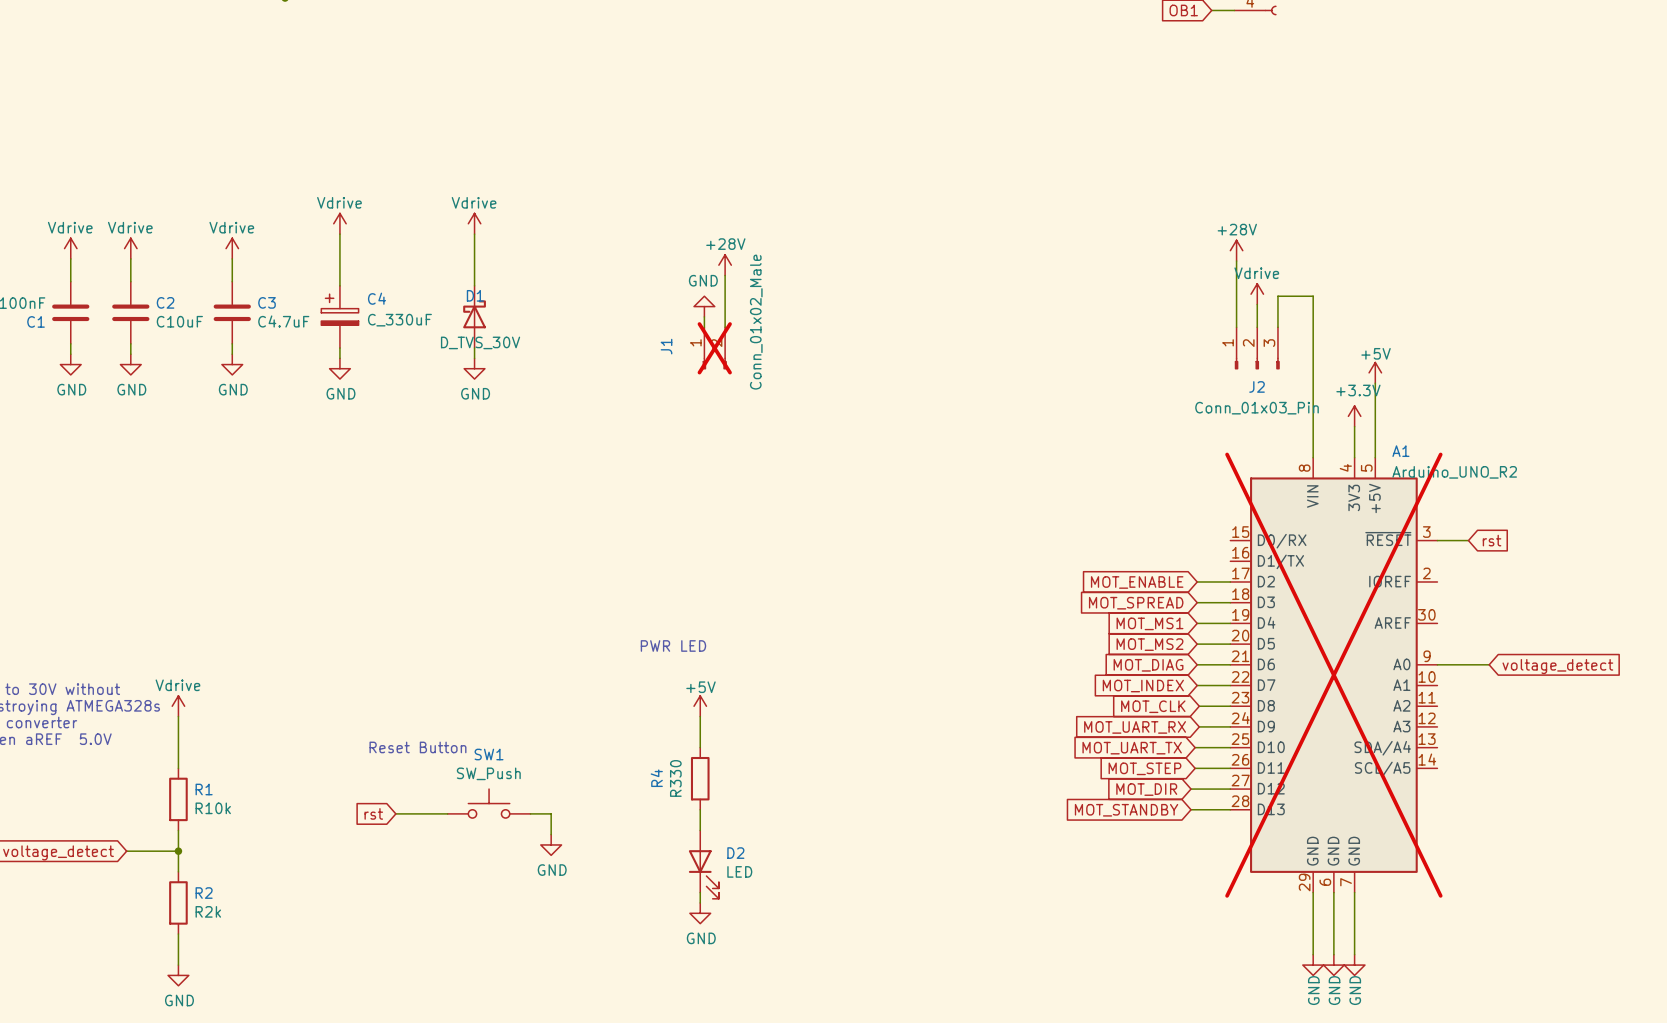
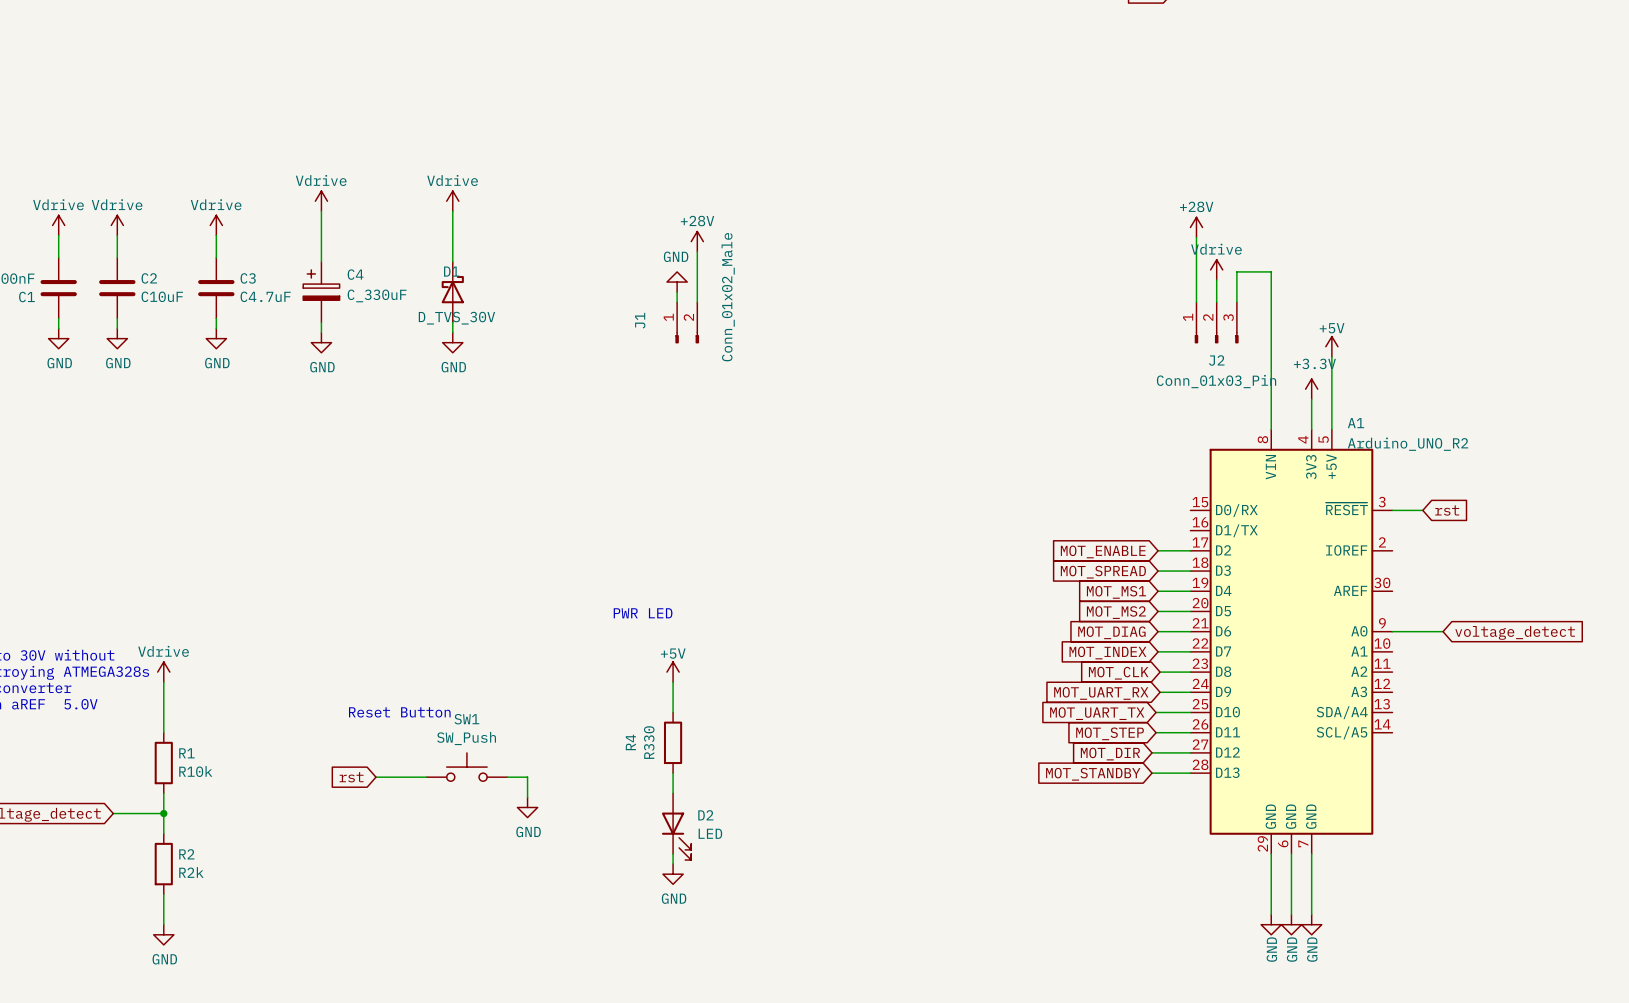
J1 do-not-place cross: (714, 348) -> none
A1 do-not-place cross: (1333, 675) -> none

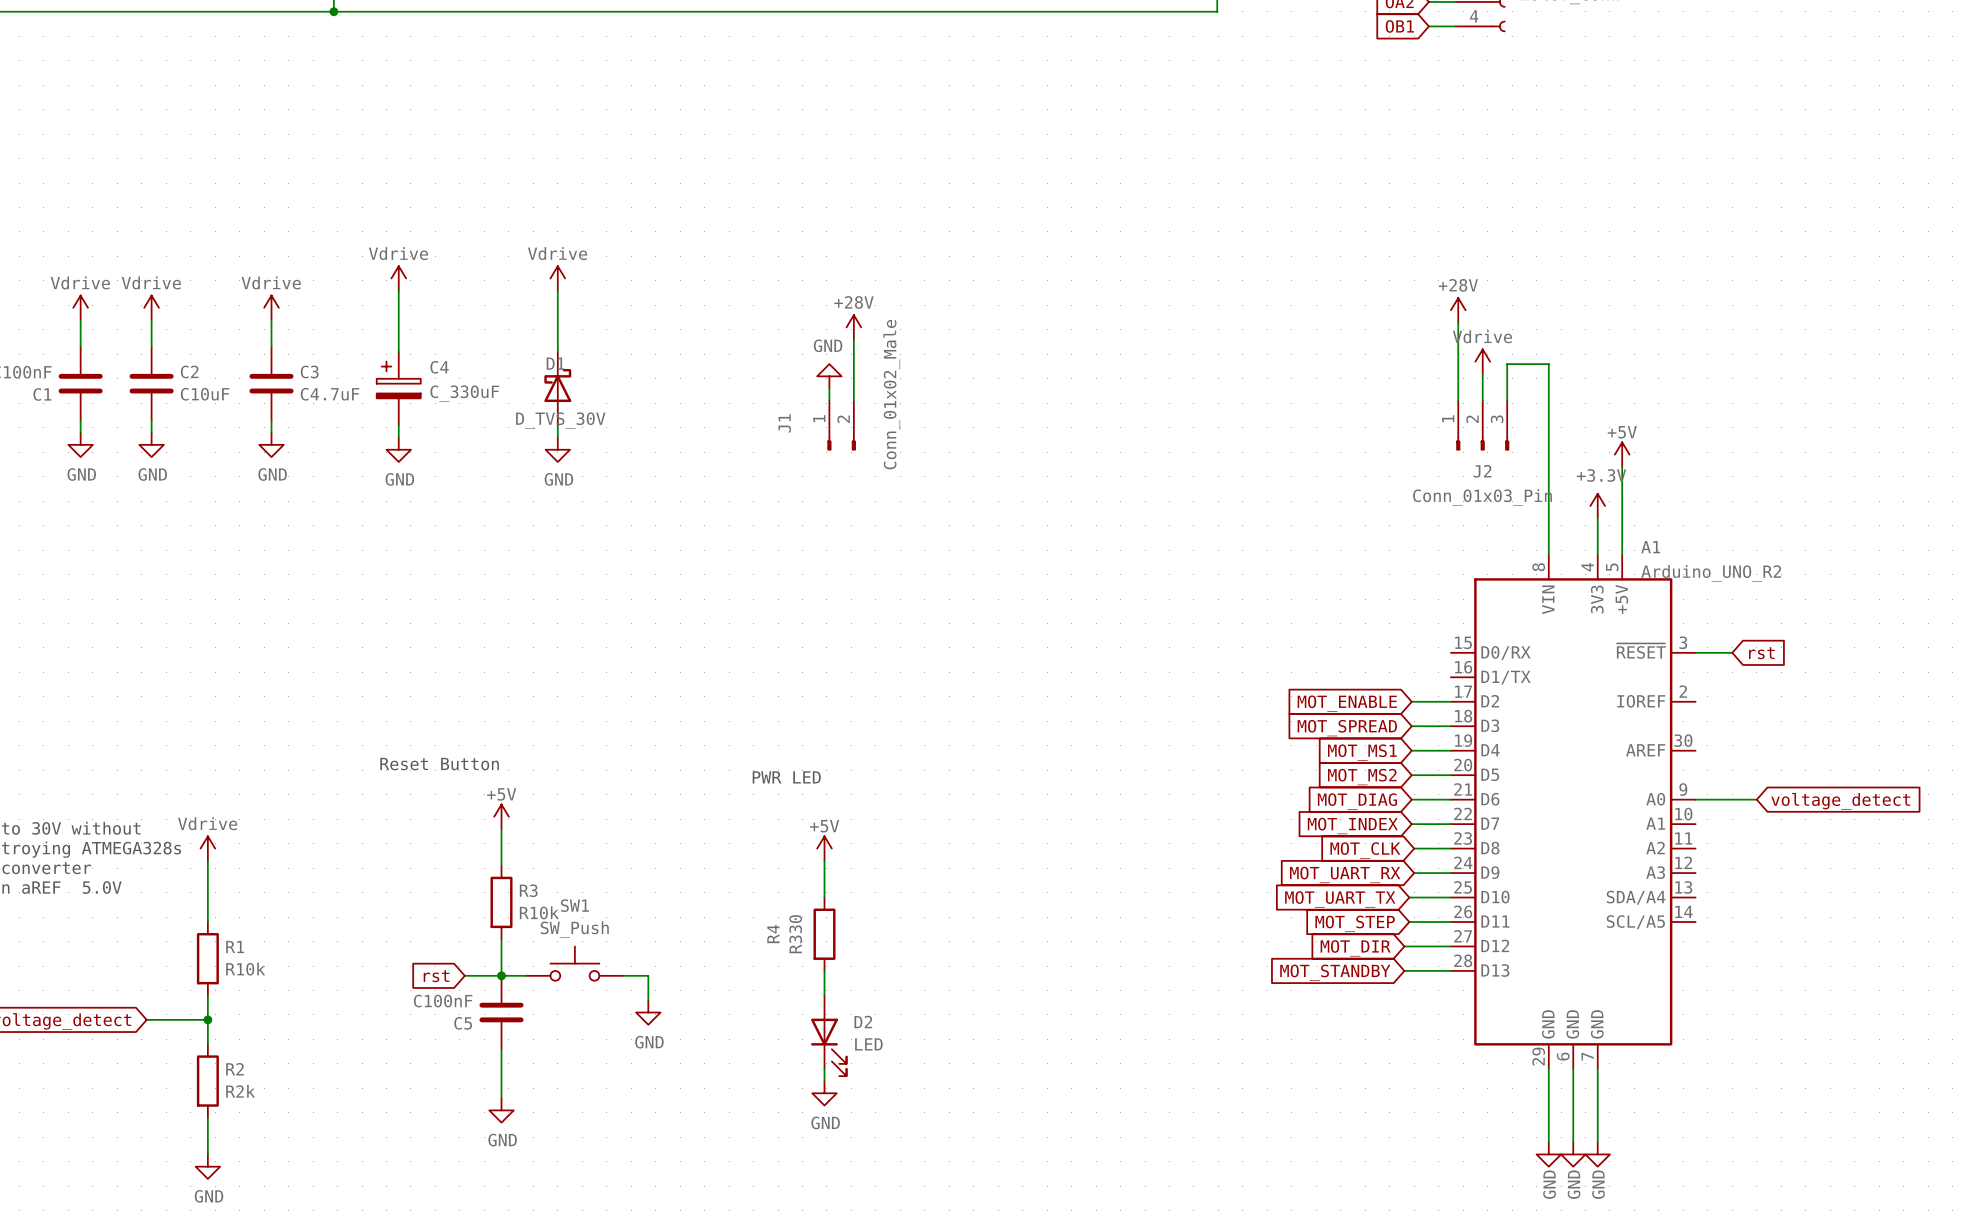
power symbol: none -> +5V (501, 816)
wire: none -> (501, 829) (501, 865)
text position: Reset Button (399, 712) -> Reset Button (439, 764)
R3: none -> R10k (501, 902)
wire: none -> (501, 939) (501, 975)
junction: none -> (501, 975)
C5: none -> C100nF (501, 1012)
wire: none -> (501, 1049) (501, 1098)
power symbol: none -> GND (501, 1110)

